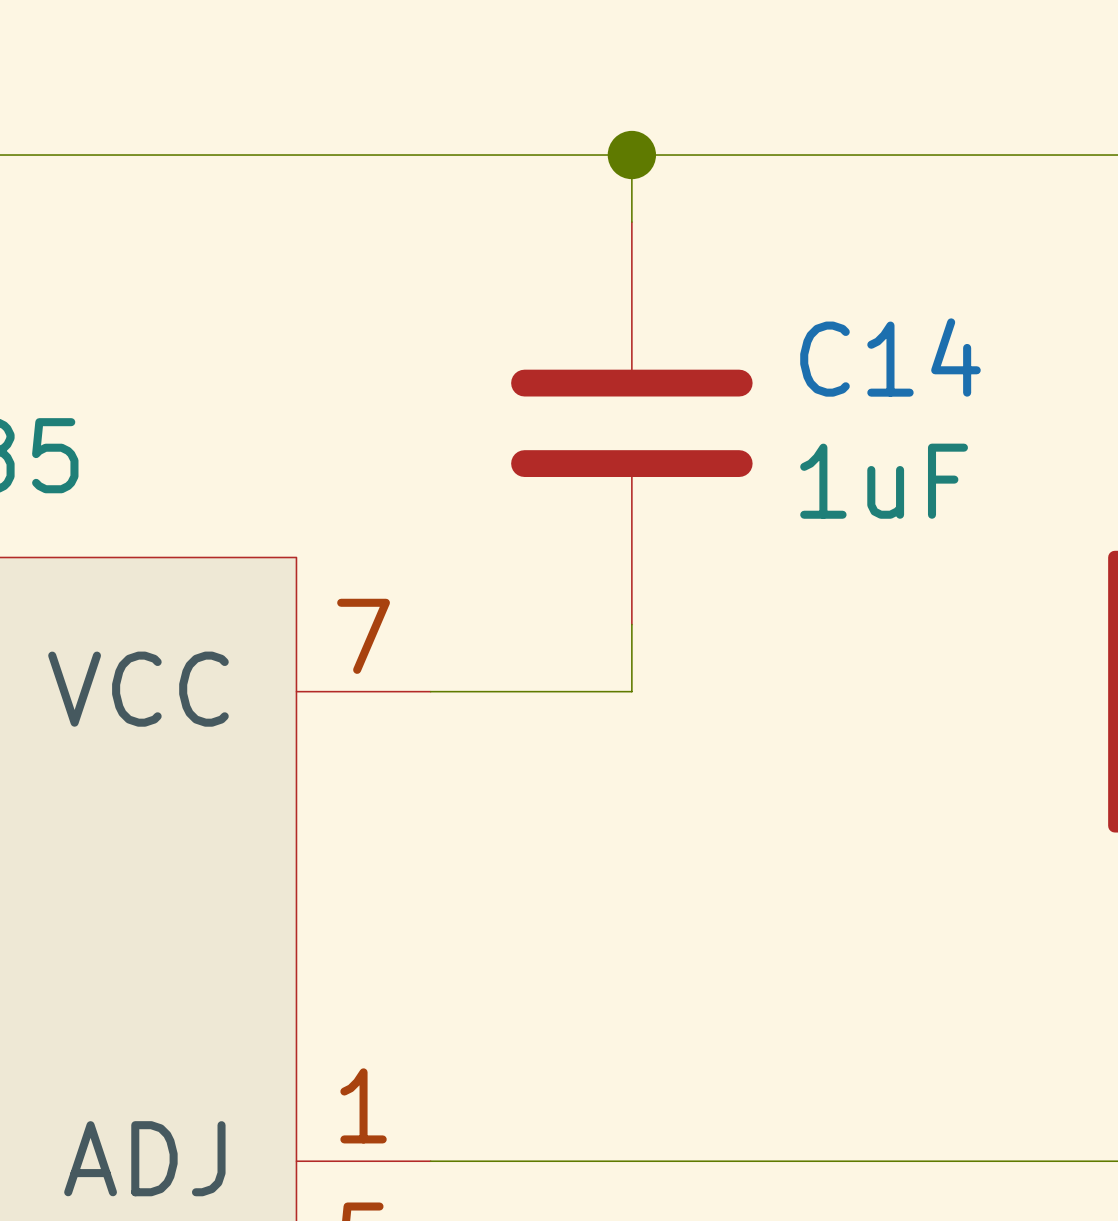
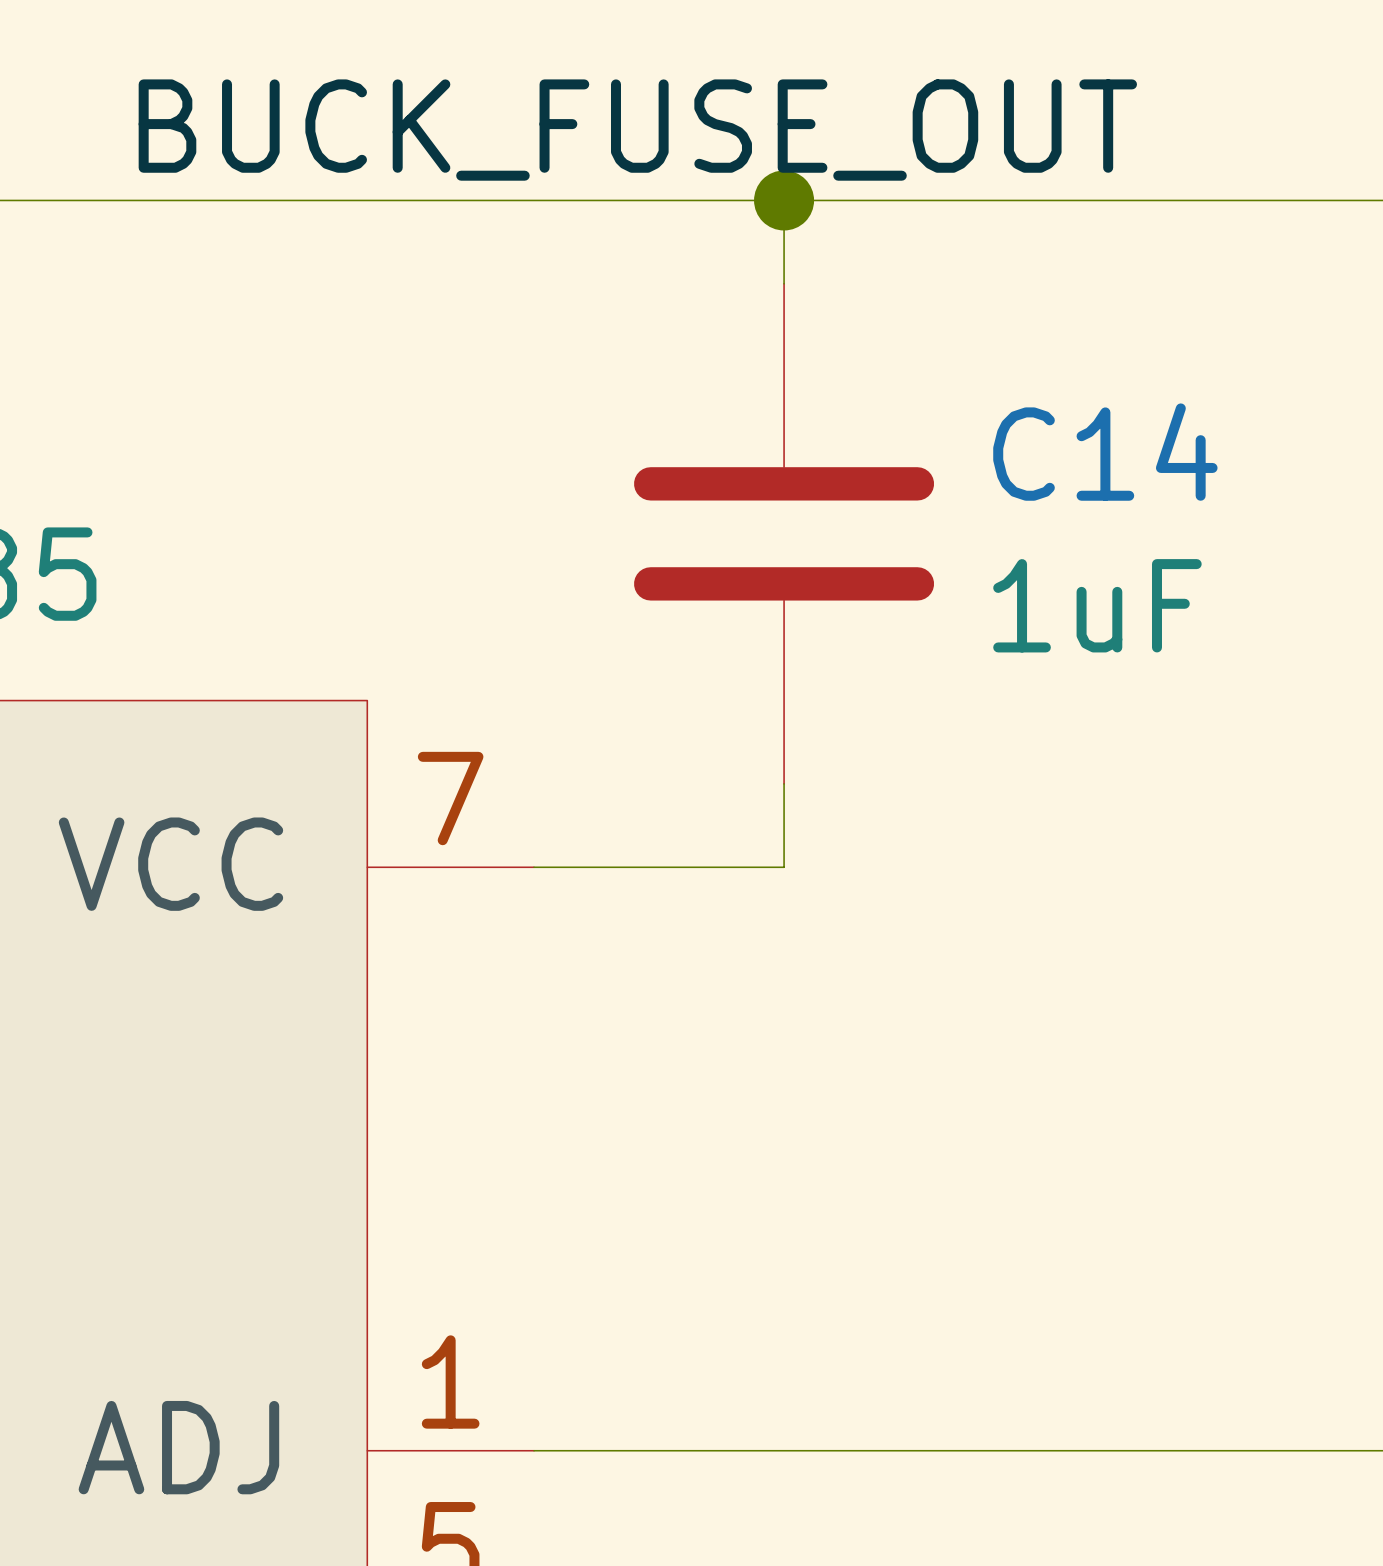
label: none -> BUCK_FUSE_OUT (637, 130)

